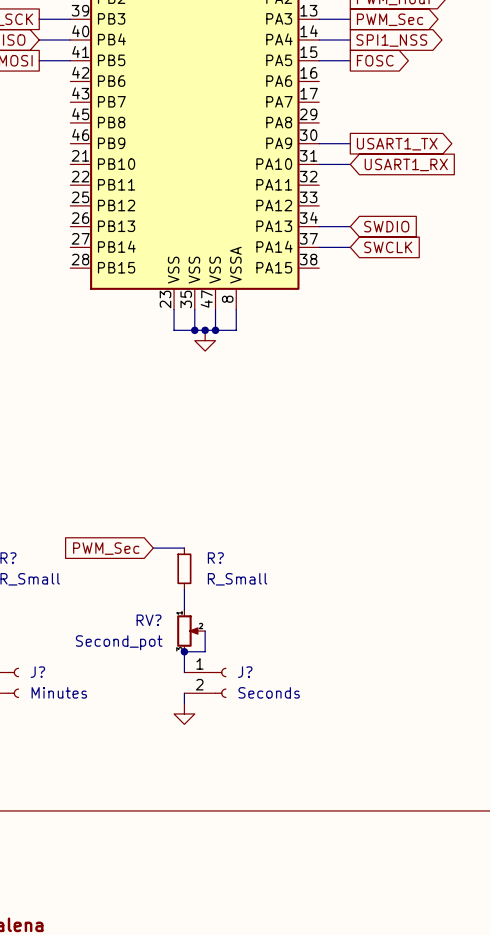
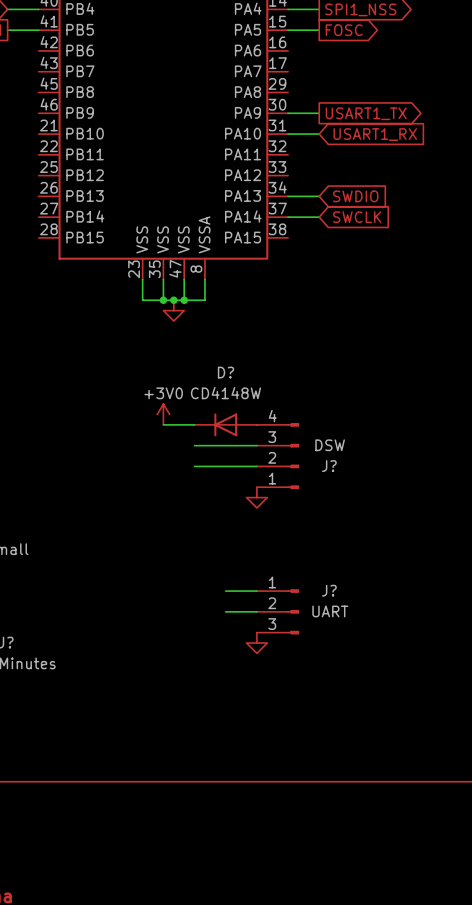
power symbol: none -> +3V0 (163, 414)
D?: none -> CD4148W (225, 424)
wire: none -> (194, 445) (256, 445)
J?: none -> DSW (277, 456)
wire: none -> (194, 466) (256, 466)
power symbol: none -> (256, 497)
global label: PWM_Sec (106, 548) -> none
wire: (153, 548) (184, 548) -> (163, 424) (194, 424)
R?: R_Small (184, 568) -> none
wire: (184, 589) (184, 610) -> none
wire: none -> (225, 591) (256, 591)
RV?: Second_pot (191, 631) -> none
wire: (205, 631) (205, 651) (184, 651) (184, 672) -> none
wire: none -> (225, 611) (256, 611)
J?: none -> UART (277, 611)
junction: (184, 651) -> none
power symbol: none -> (256, 643)
J?: Seconds (205, 682) -> none
wire: (184, 693) (184, 703) -> none
power symbol: (184, 713) -> none

